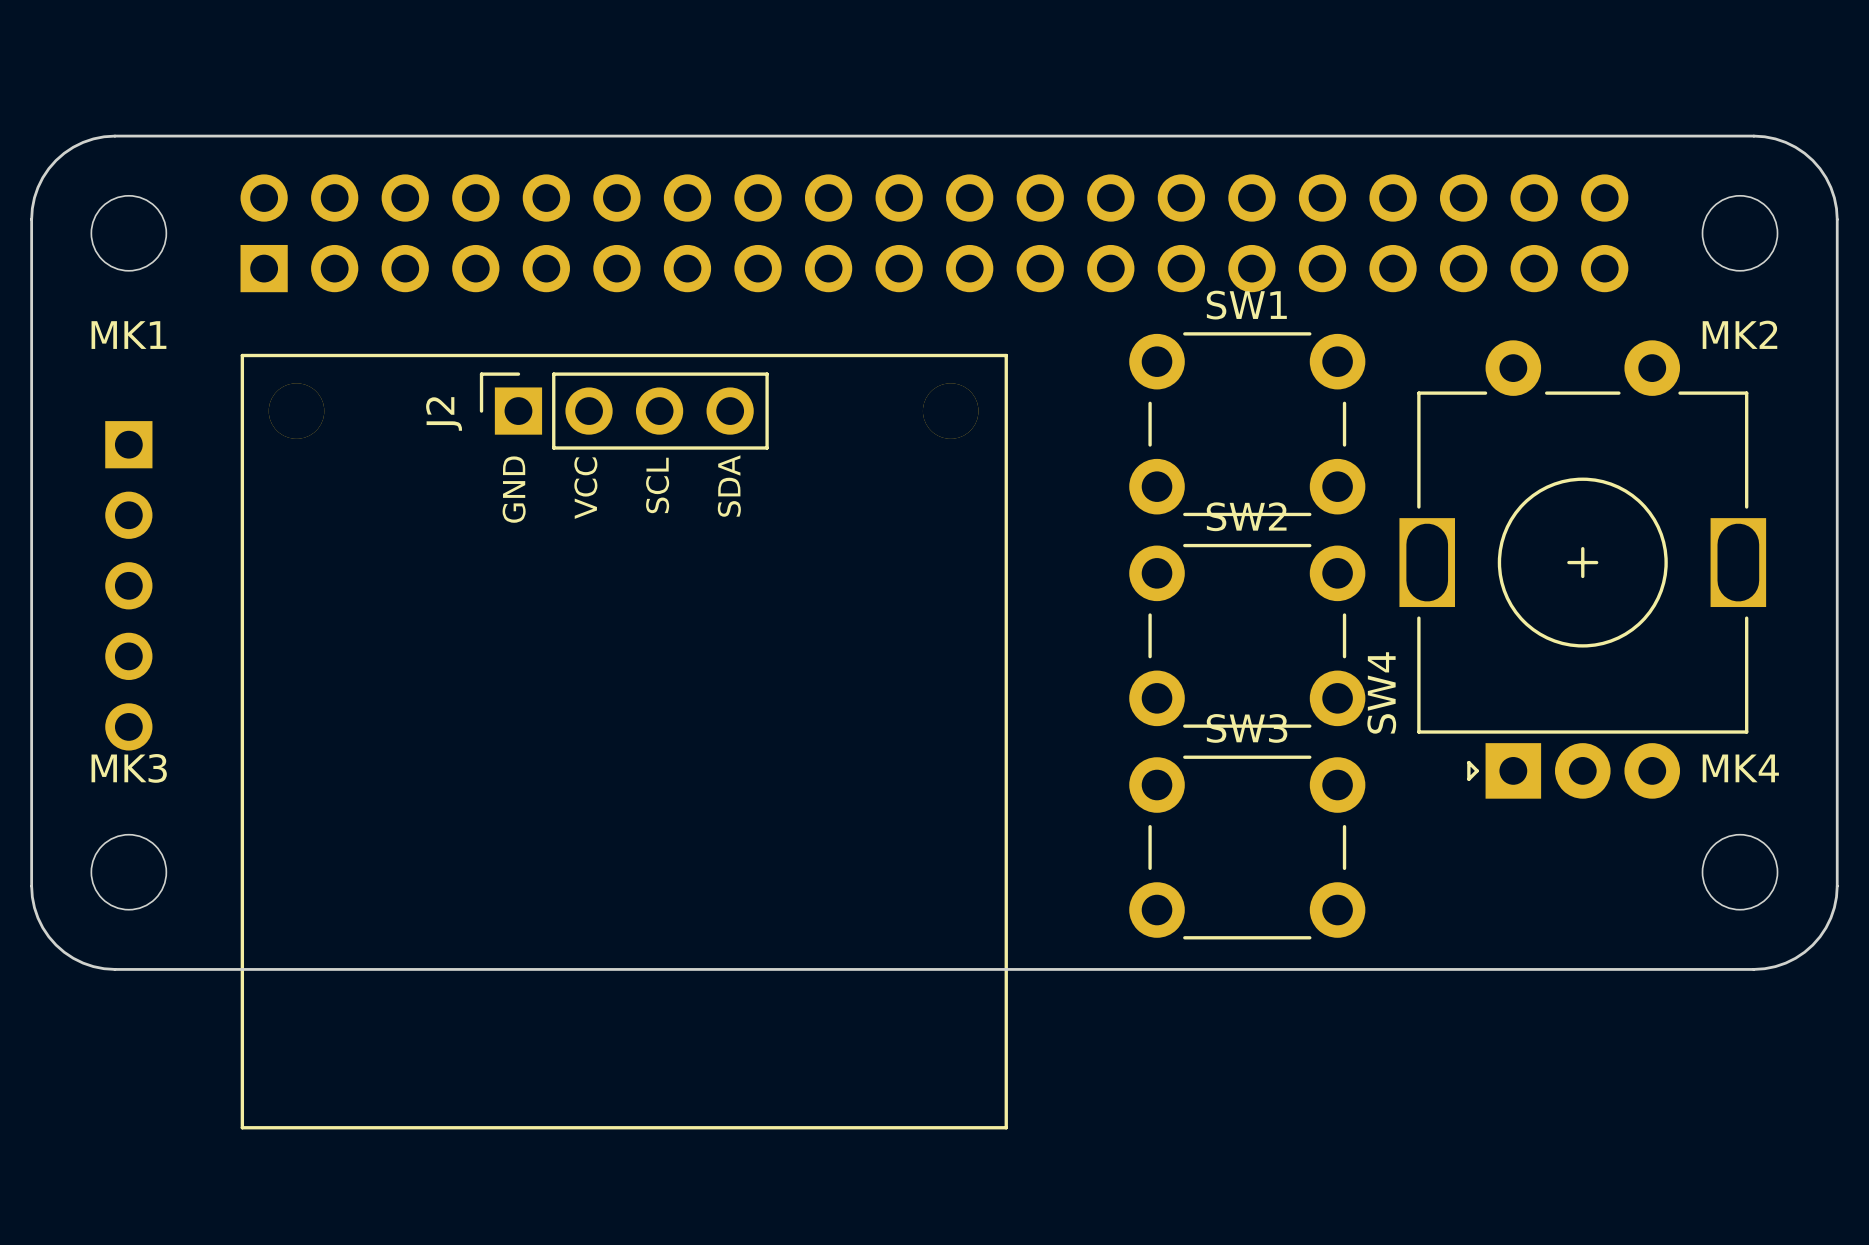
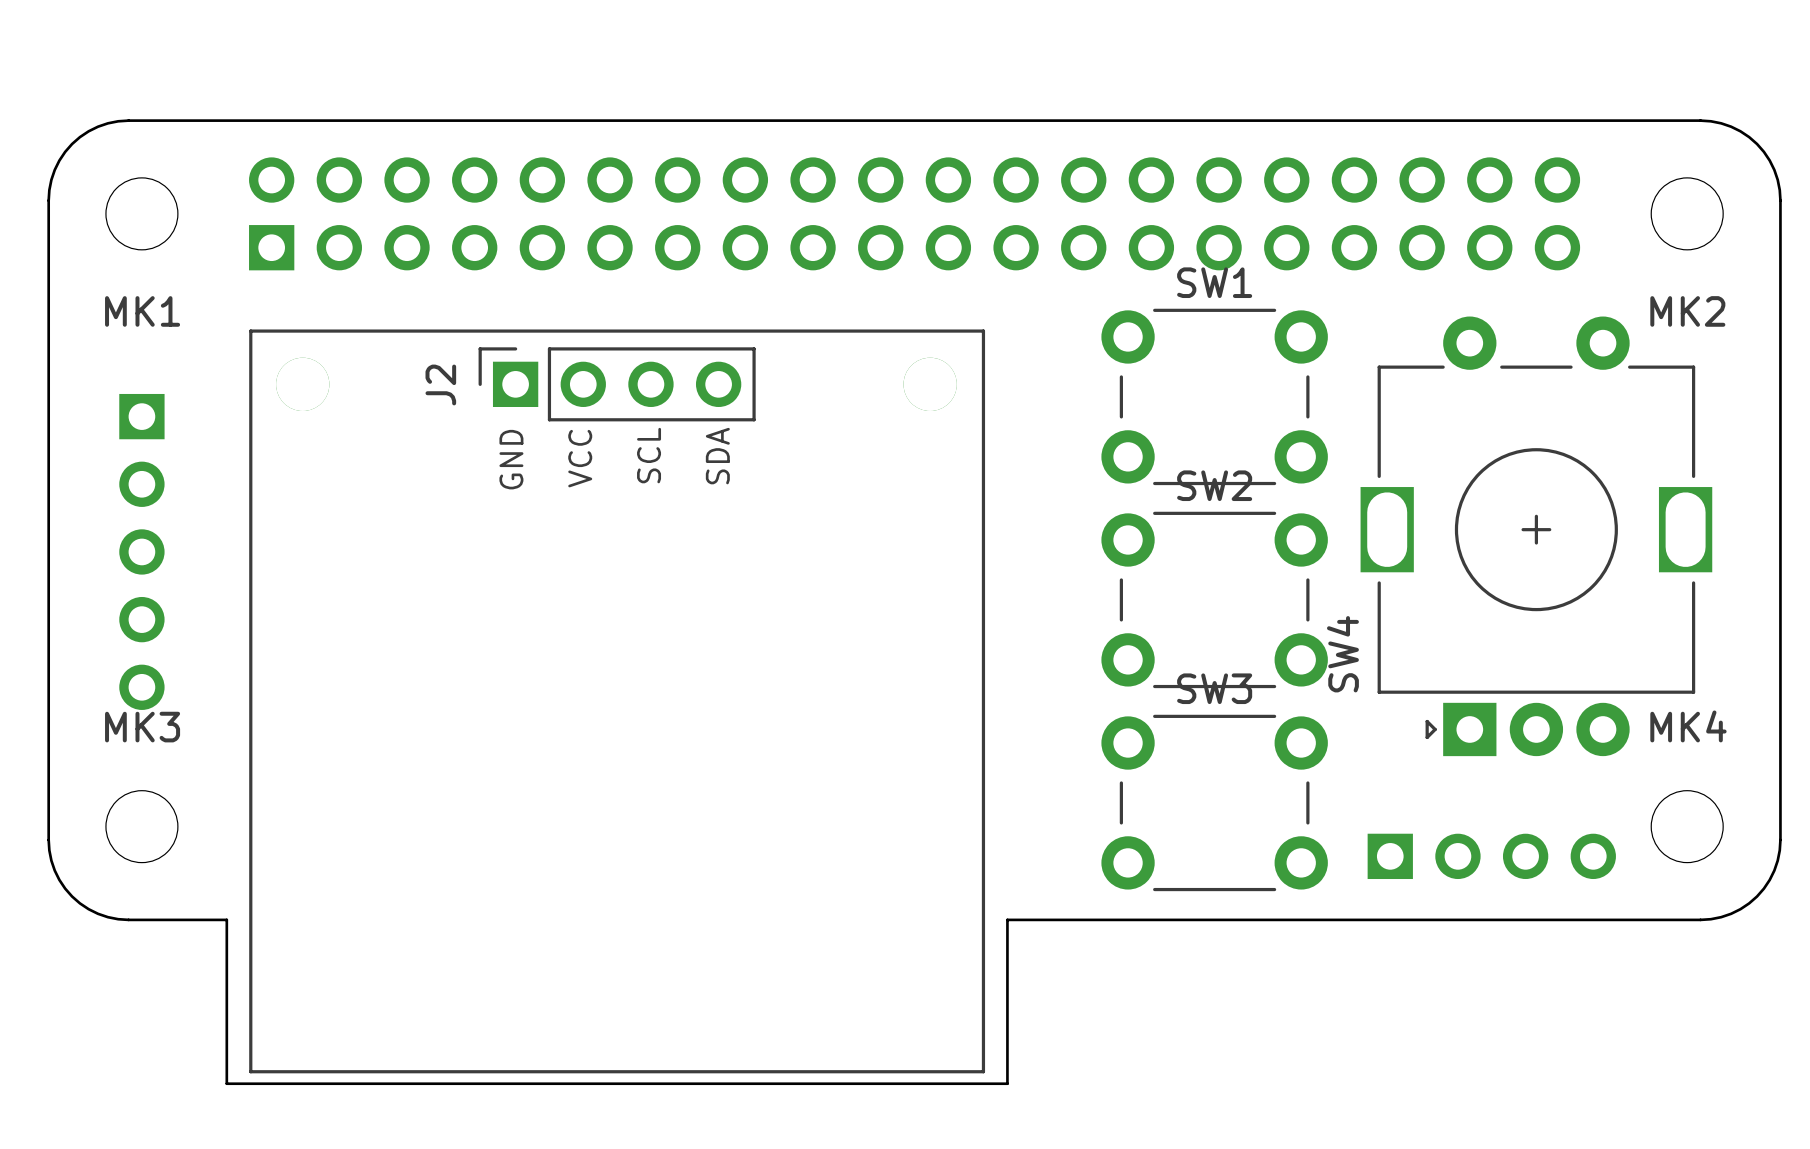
part: none -> (1491, 856)
board edge: (217, 969) (1031, 969) -> (226, 919) (226, 1083) (1007, 1083) (1007, 919)

